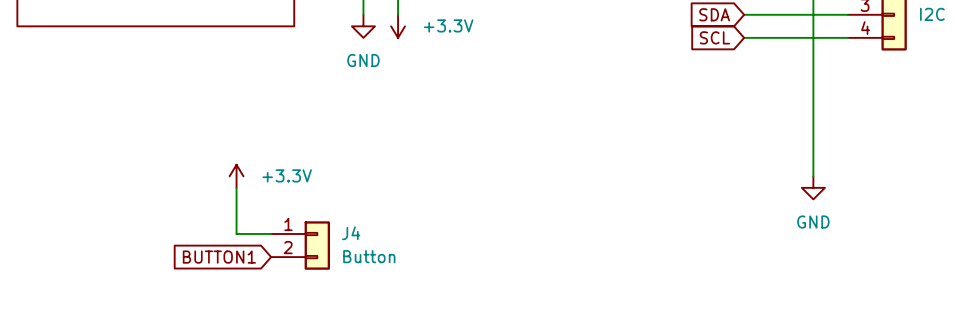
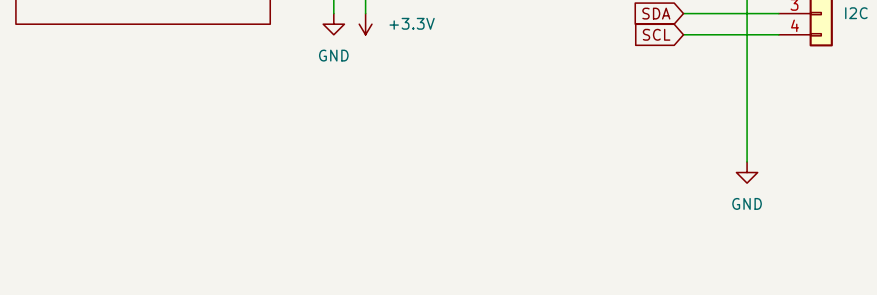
power symbol: +3.3V (236, 176) -> none
wire: (236, 187) (236, 234) (271, 234) -> none
J4: Button (300, 245) -> none
global label: BUTTON1 (219, 257) -> none

